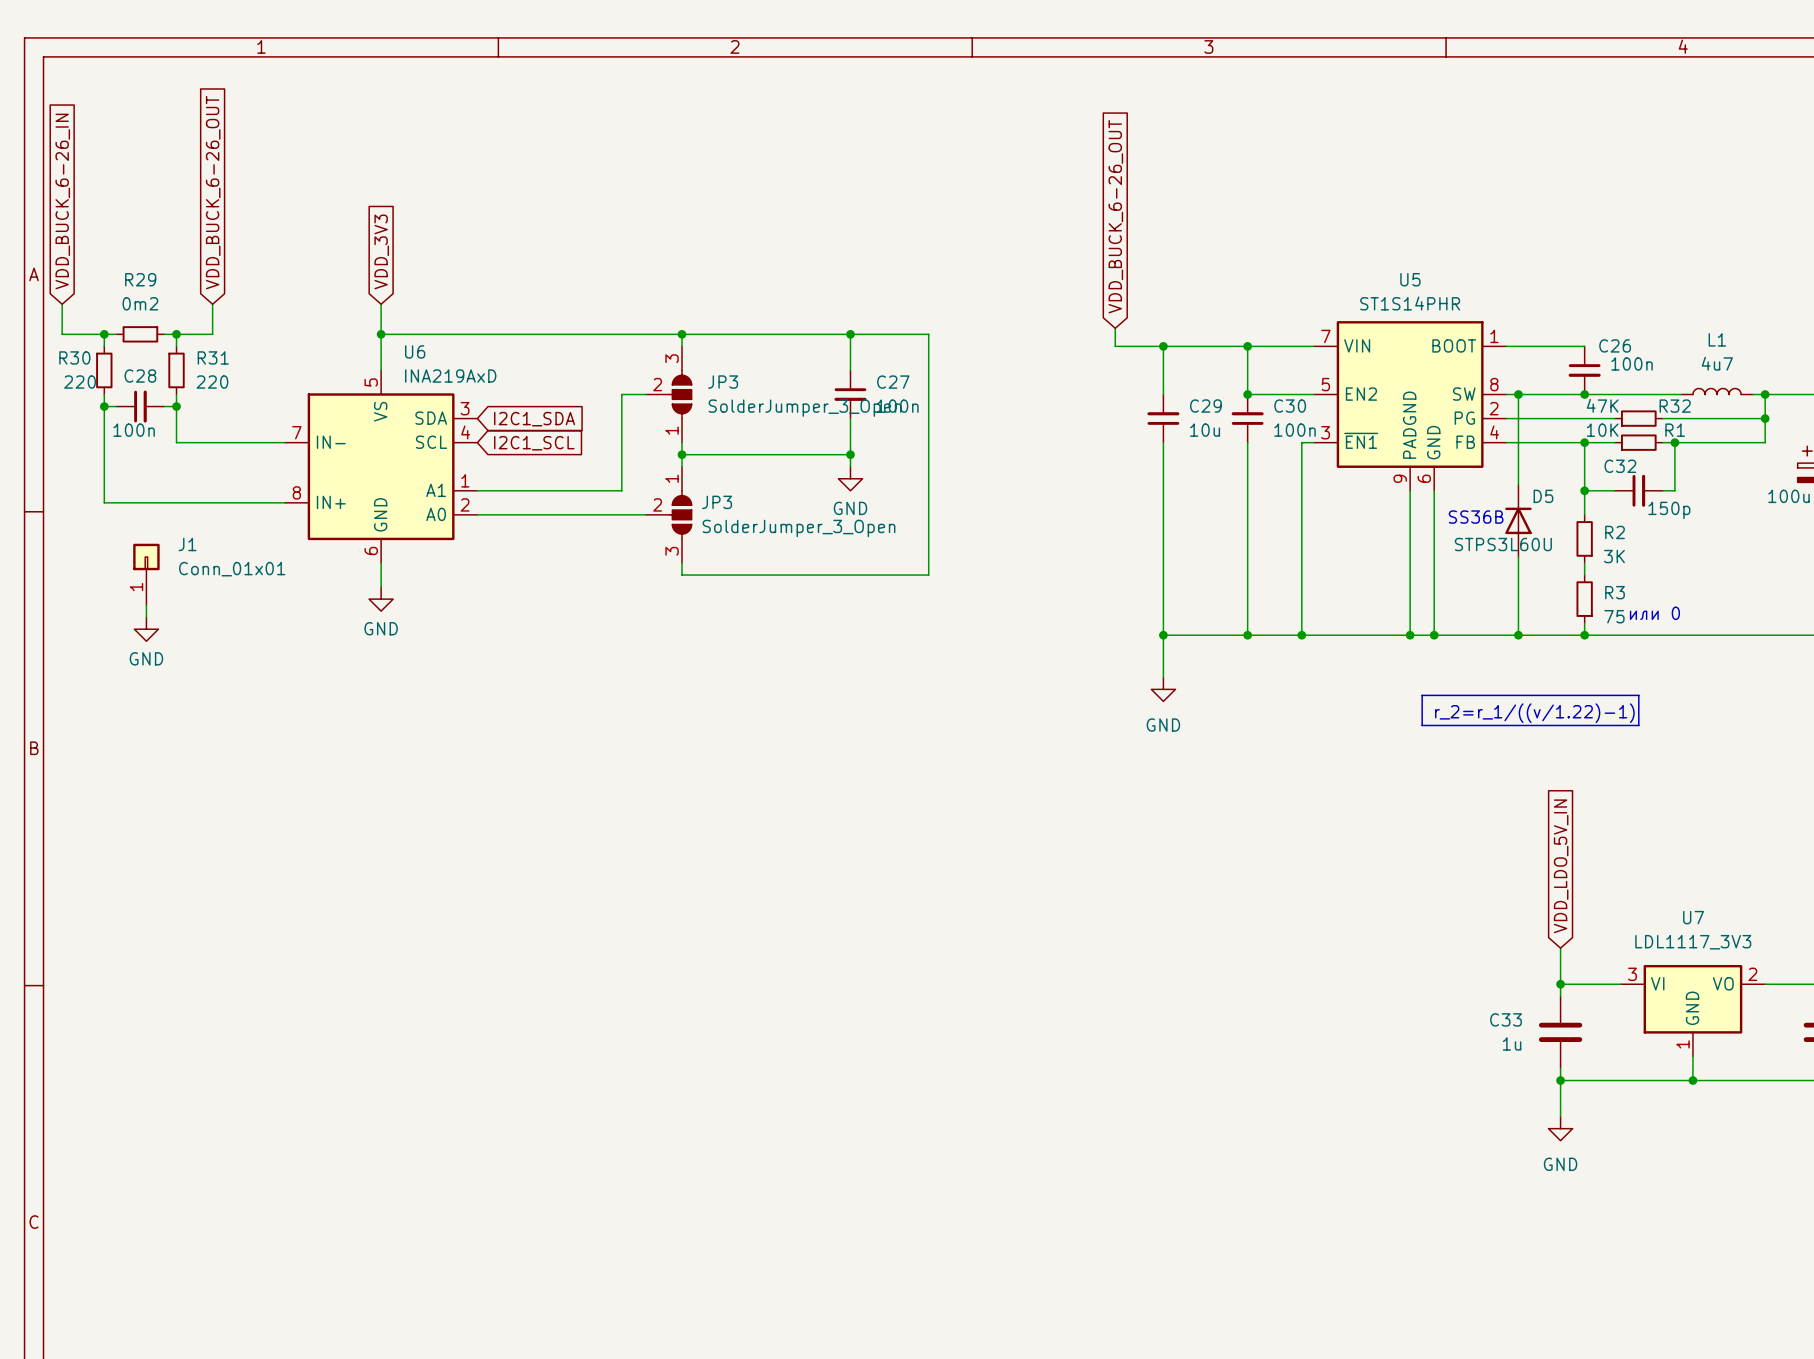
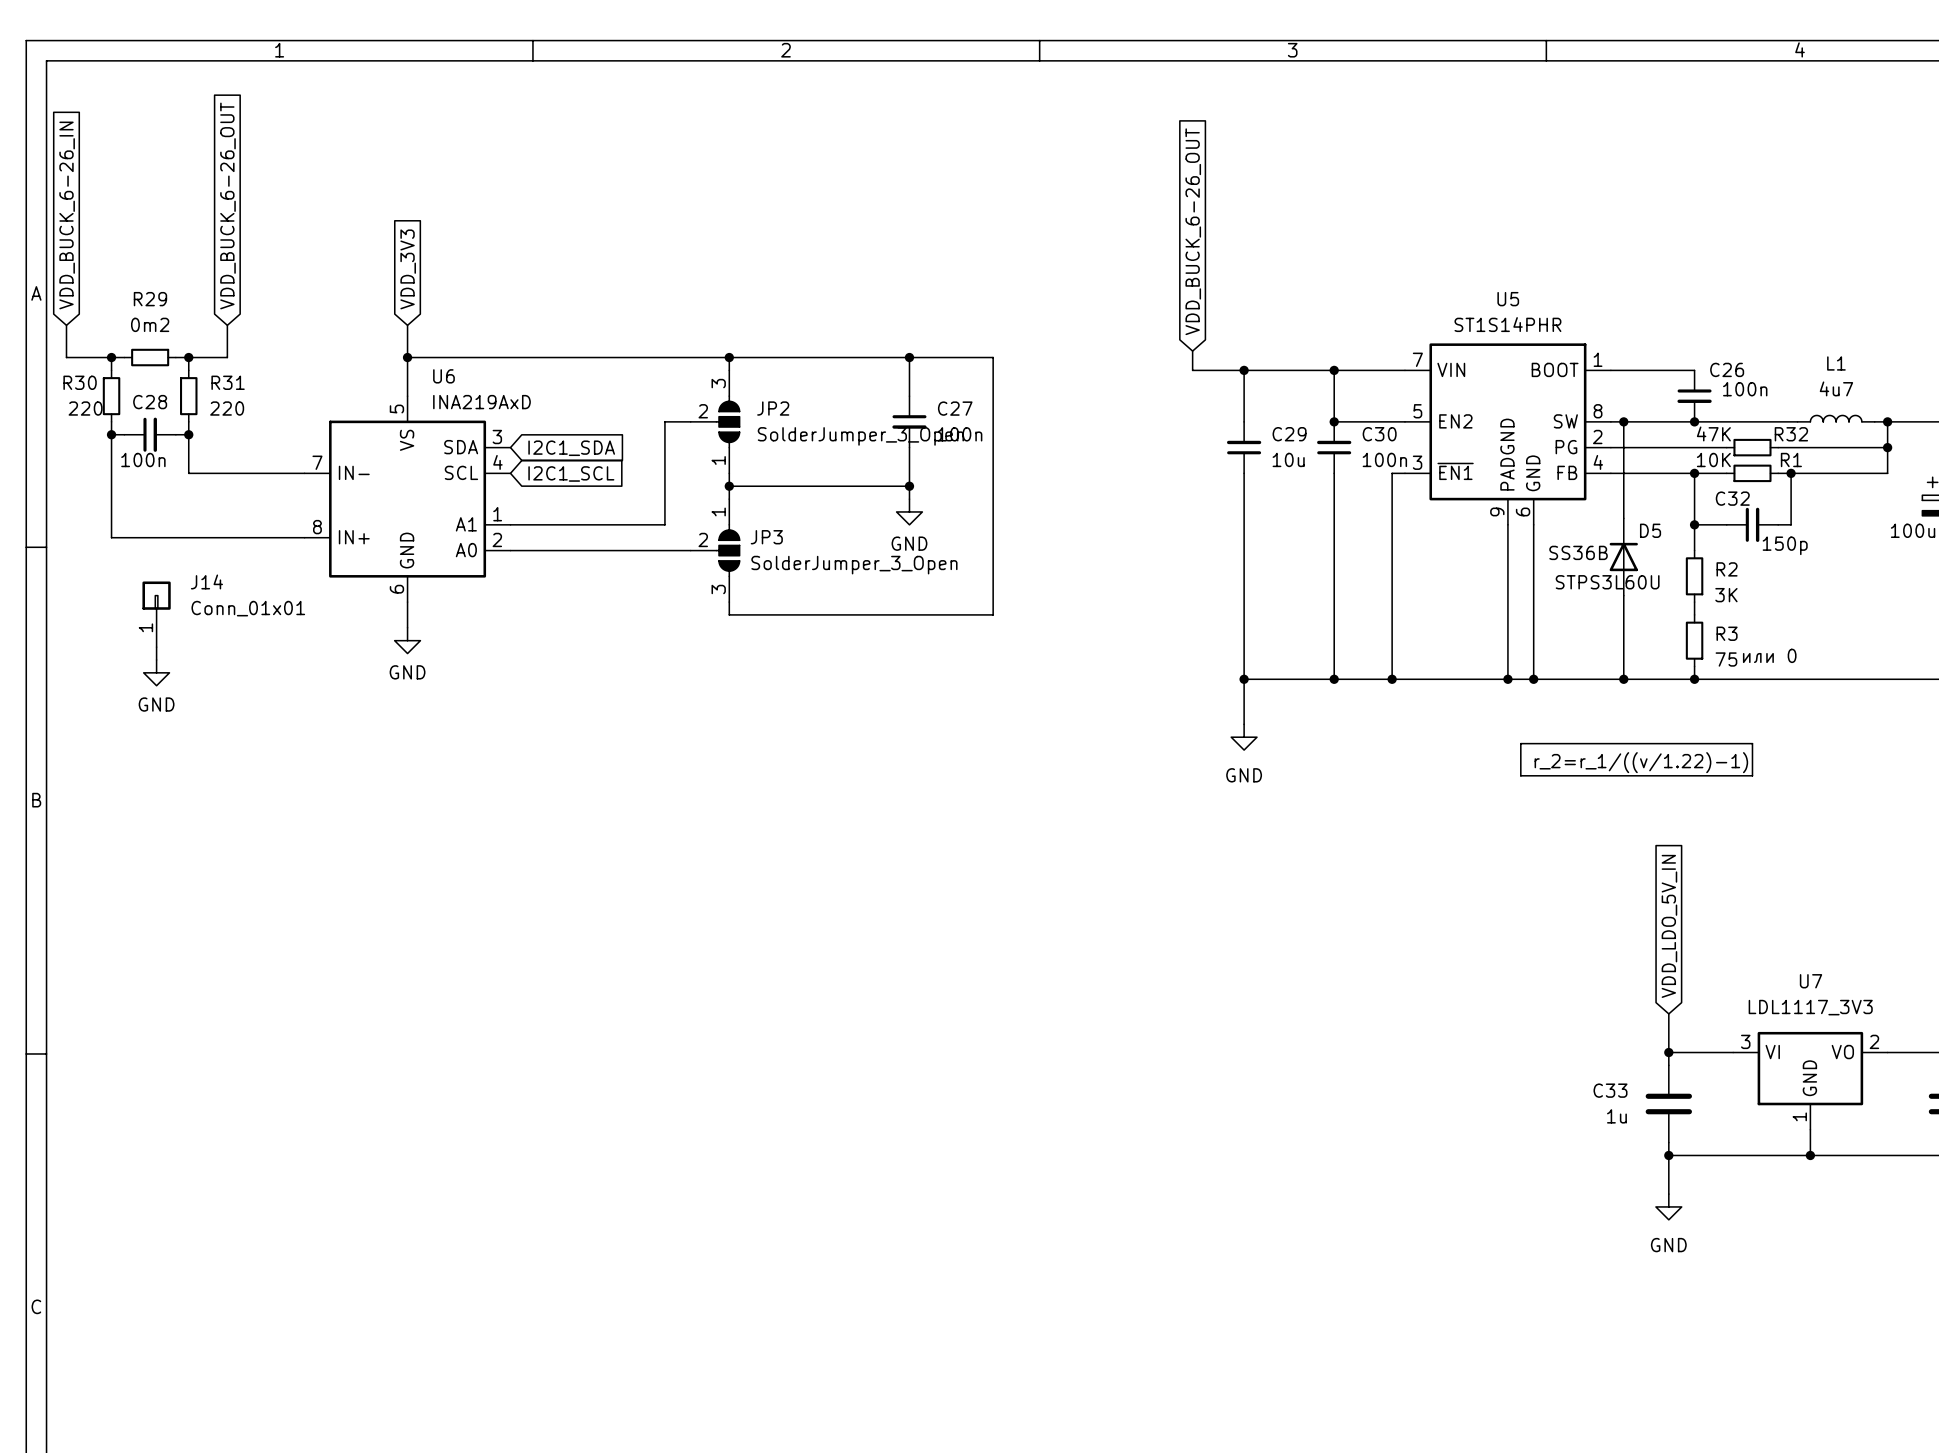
JP3 name: JP3 (723, 382) -> JP2 (773, 408)
J1 name: J1 (187, 544) -> J14 (206, 581)

